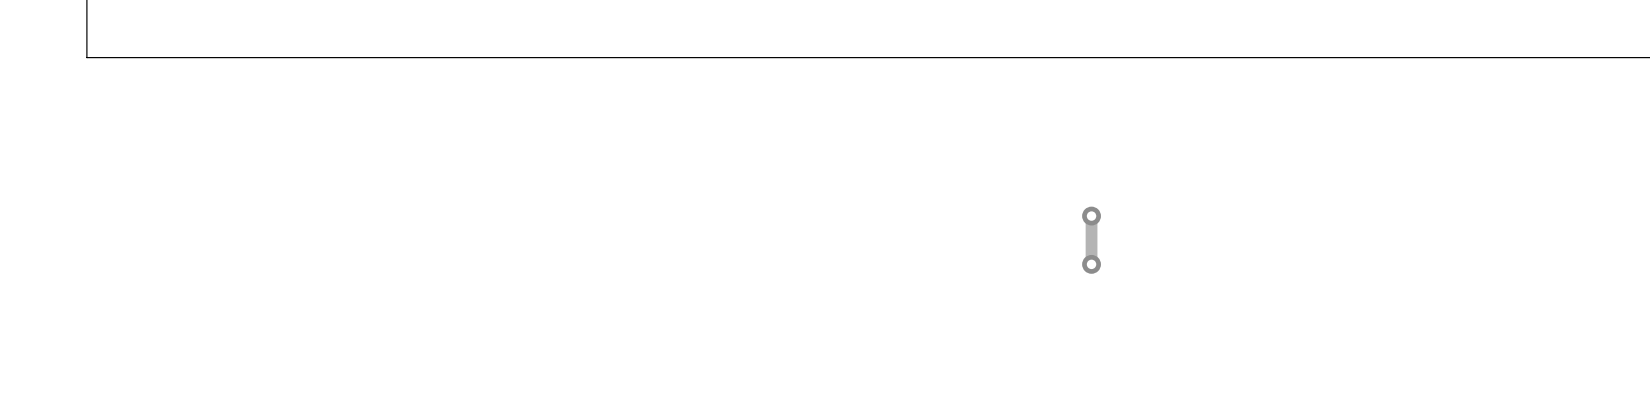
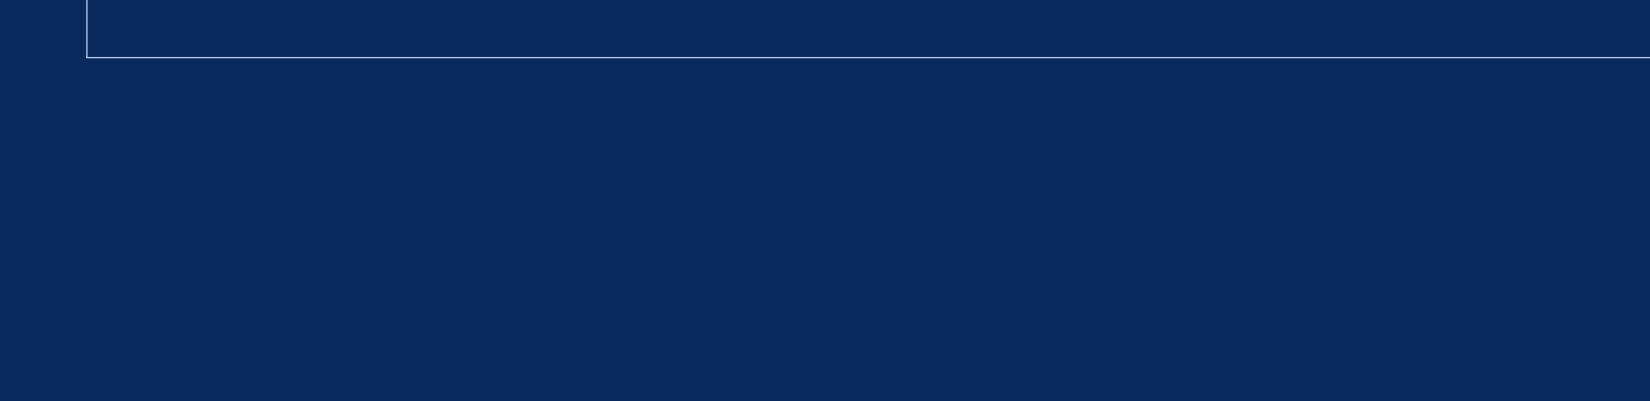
track: (1091, 216) (1091, 264) -> none
via: (1091, 216) -> none
via: (1091, 264) -> none

